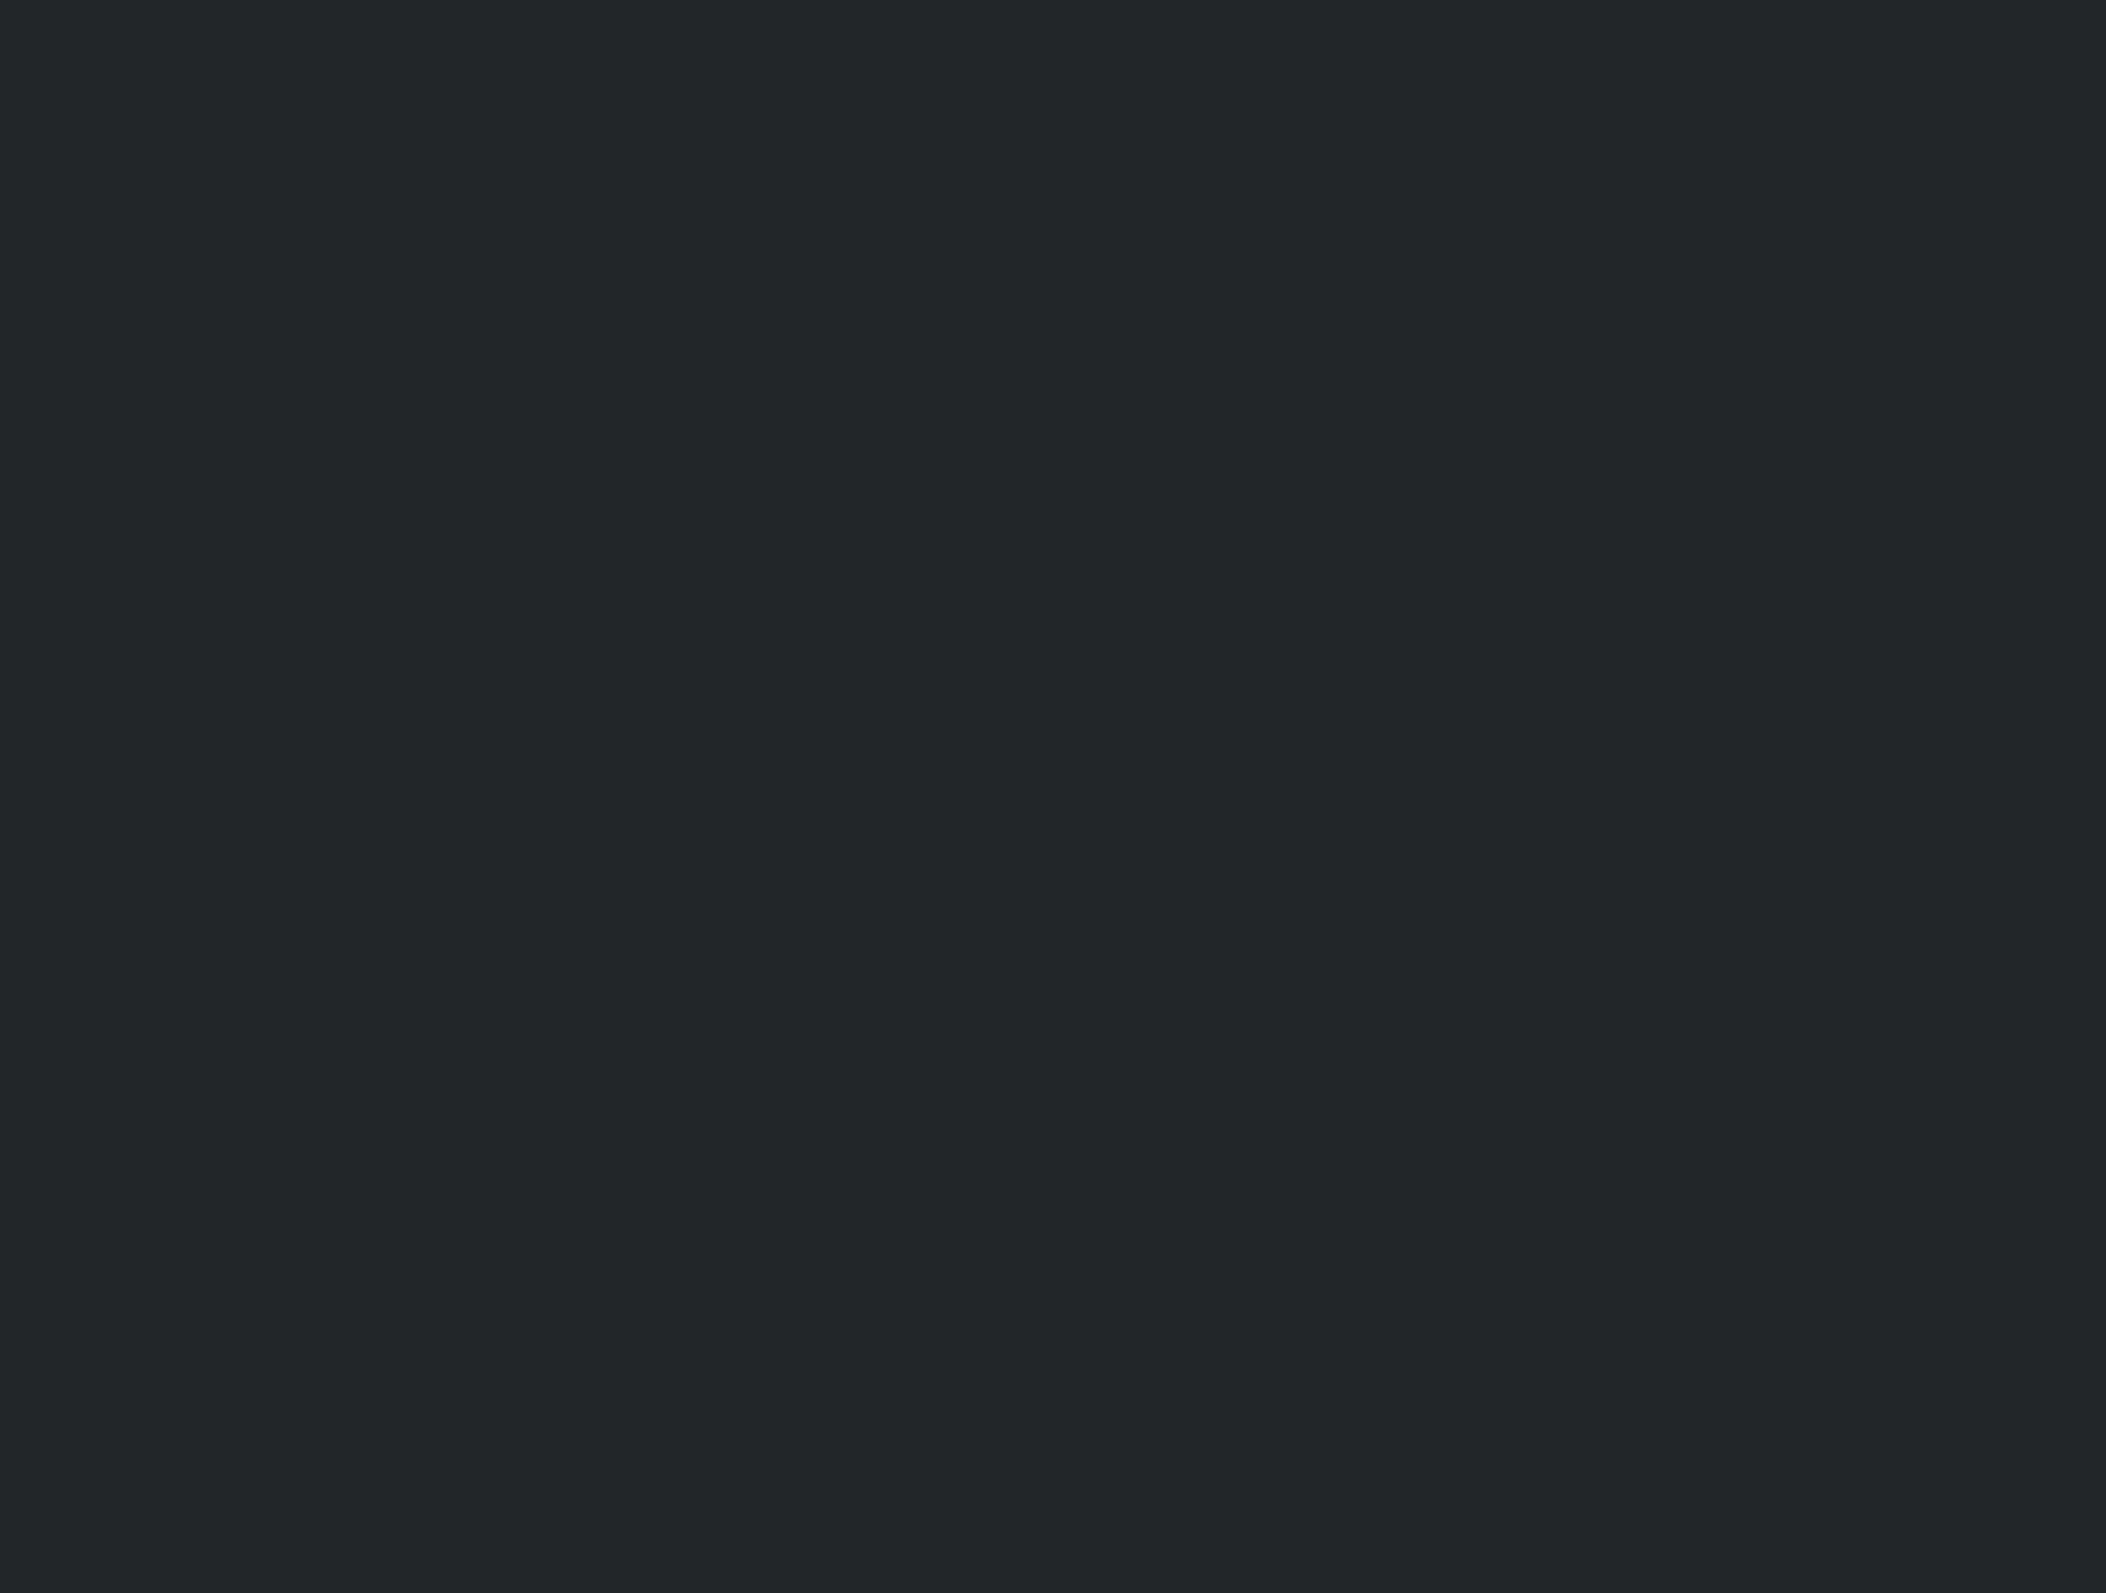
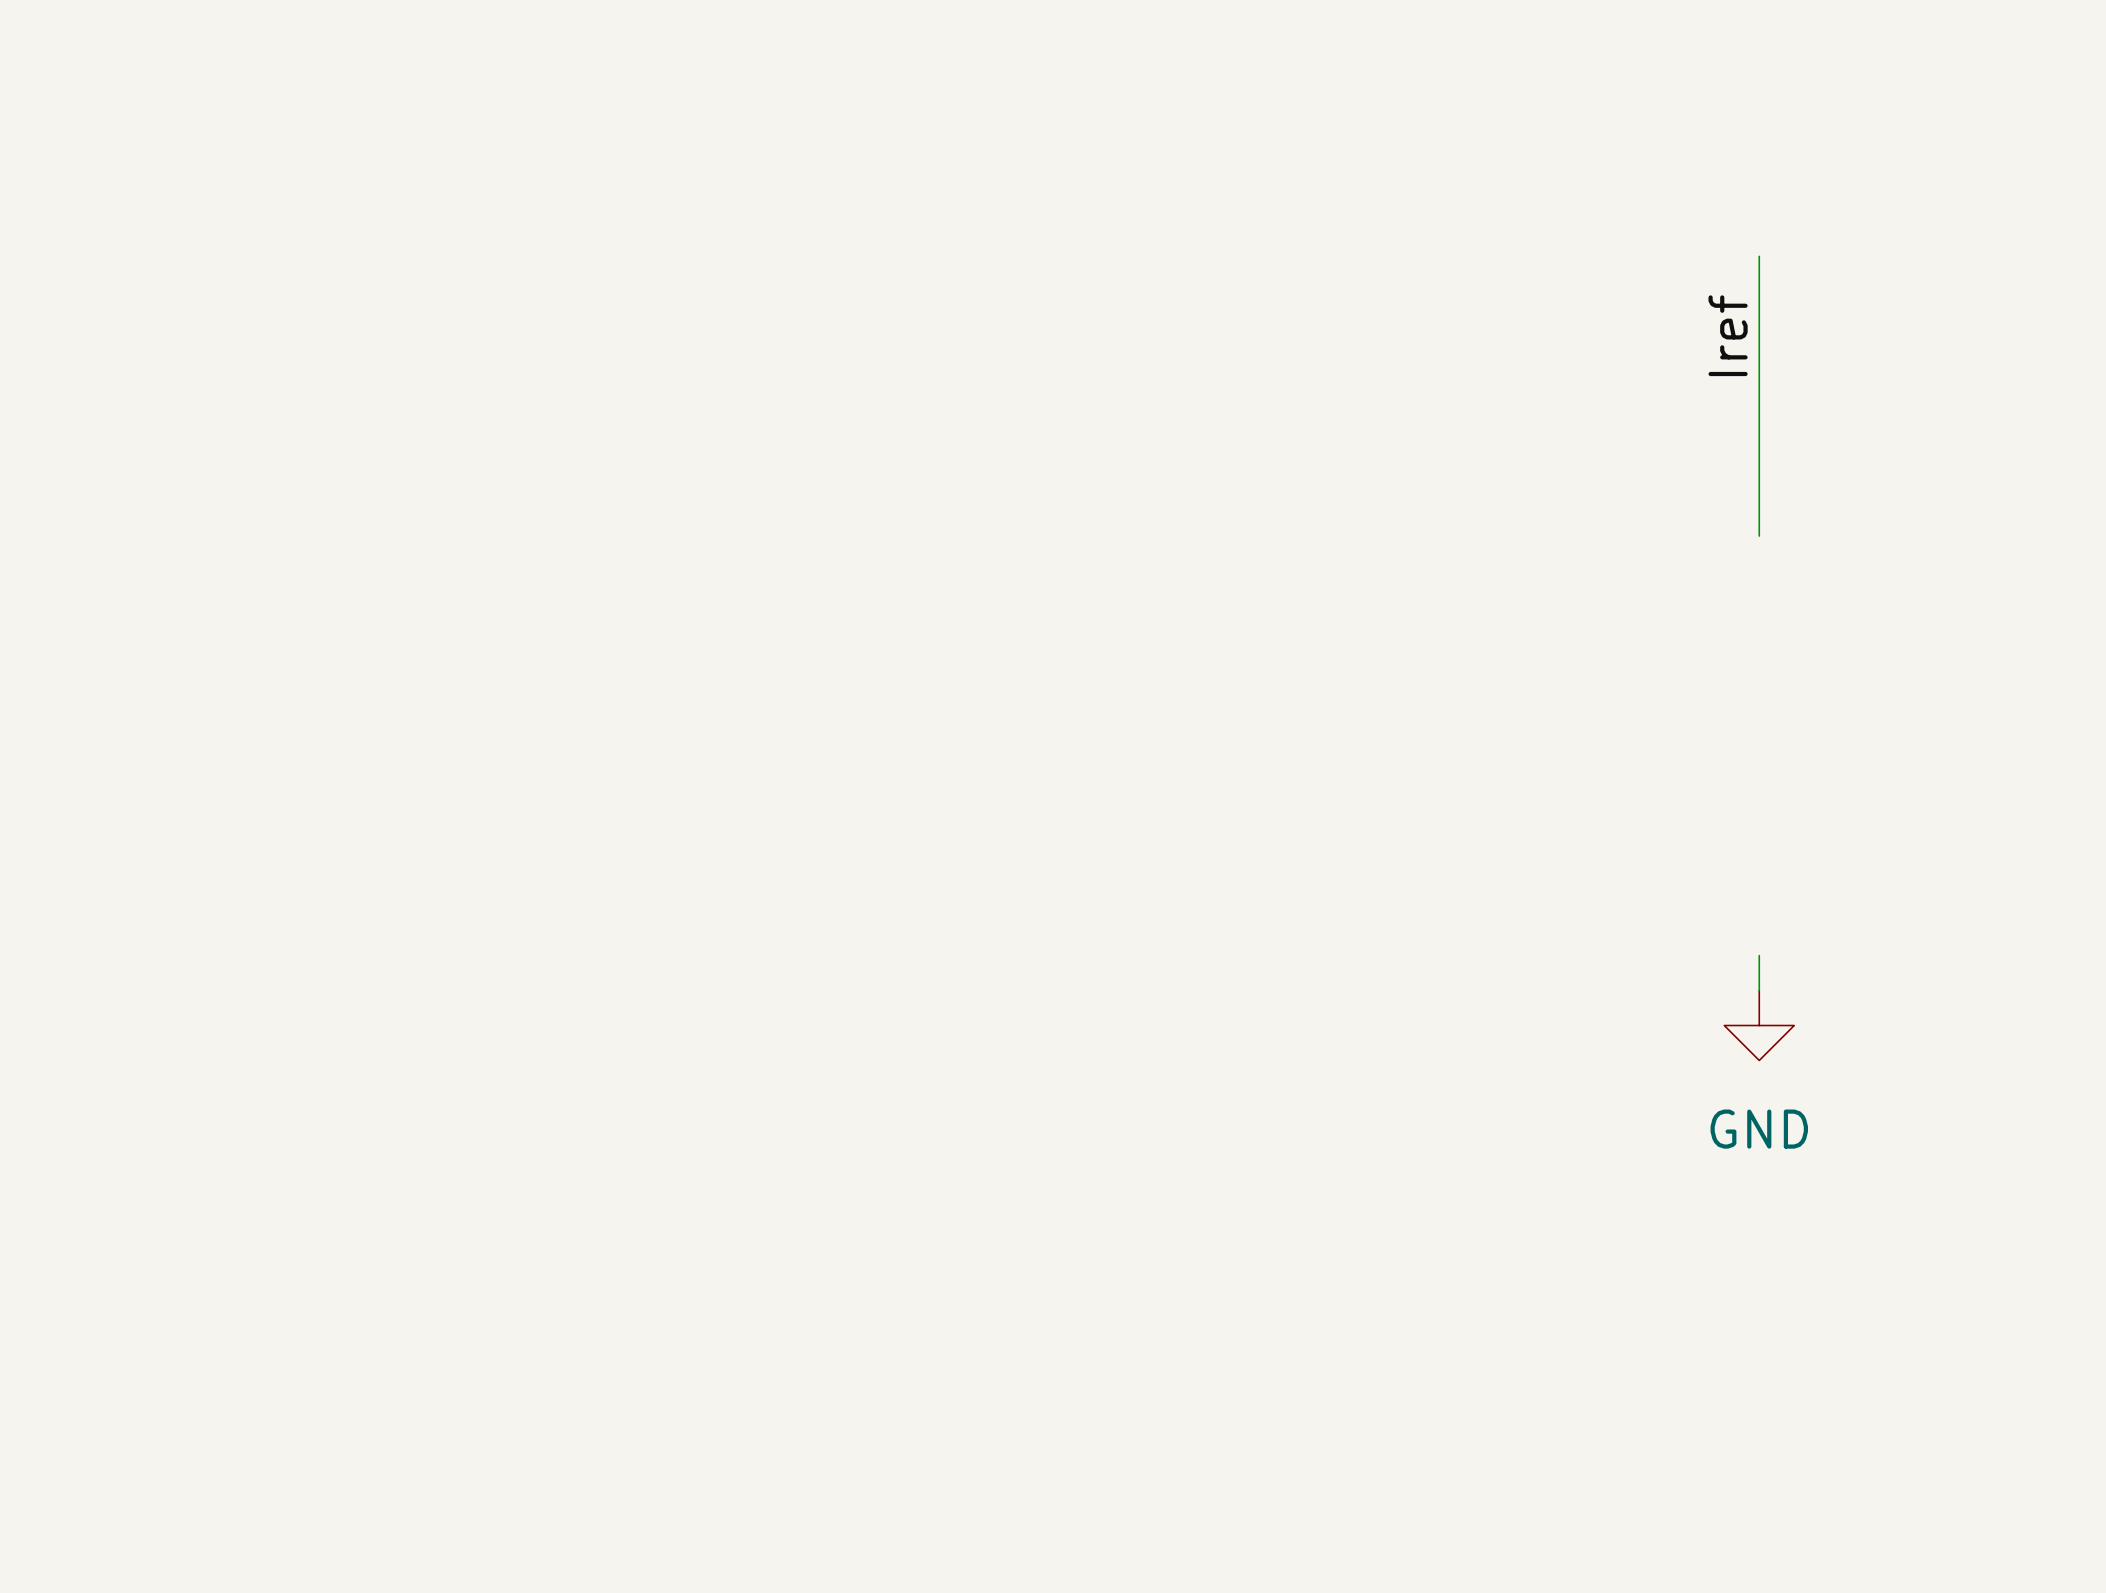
wire: none -> (1759, 256) (1759, 536)
label: none -> Iref (1728, 335)
wire: none -> (1759, 955) (1759, 990)
power symbol: none -> GND (1759, 1025)

